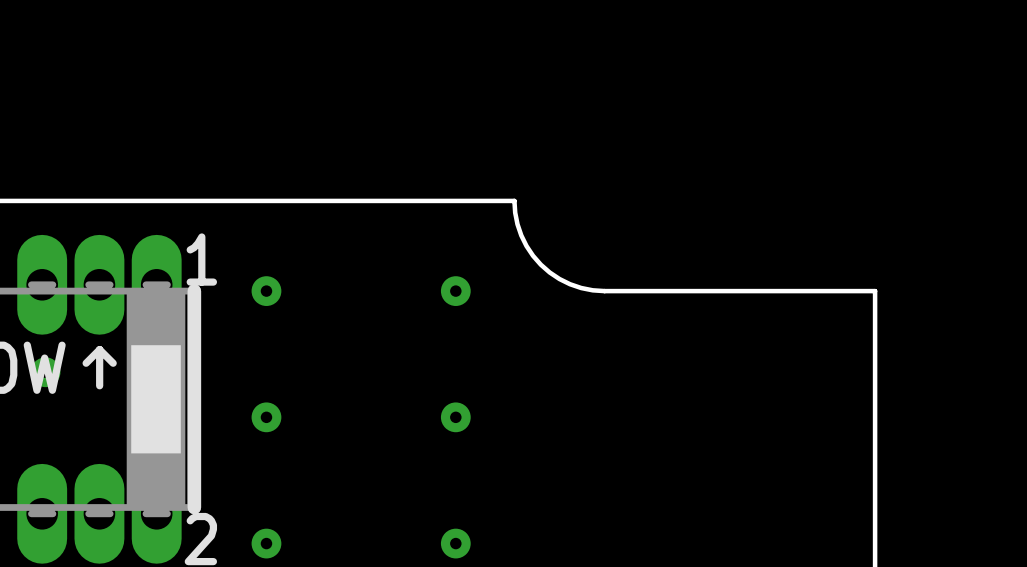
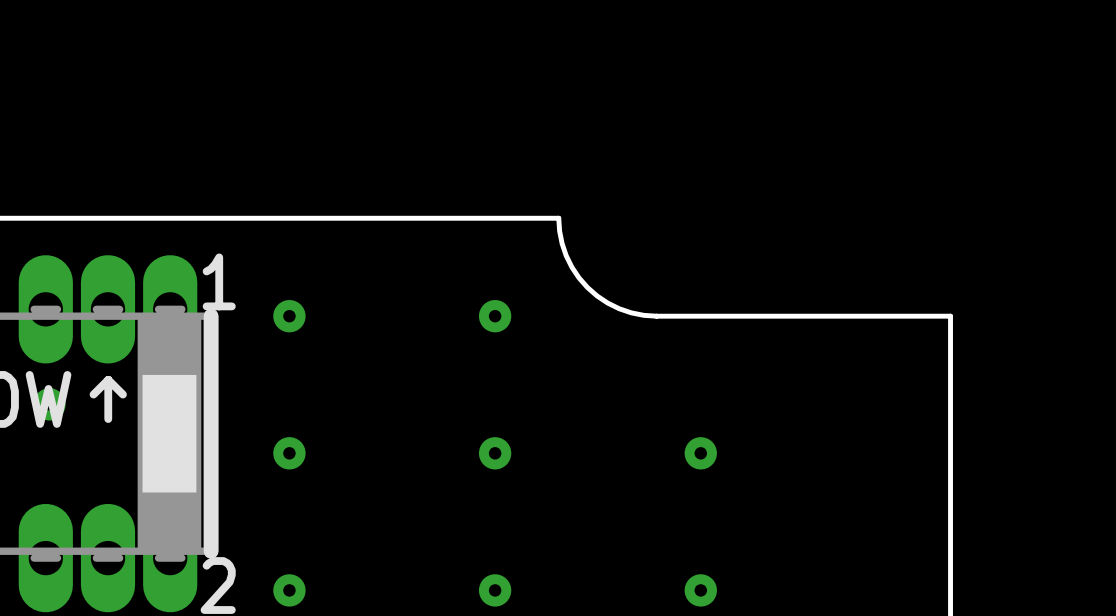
via: none -> (700, 453)
via: none -> (700, 590)

